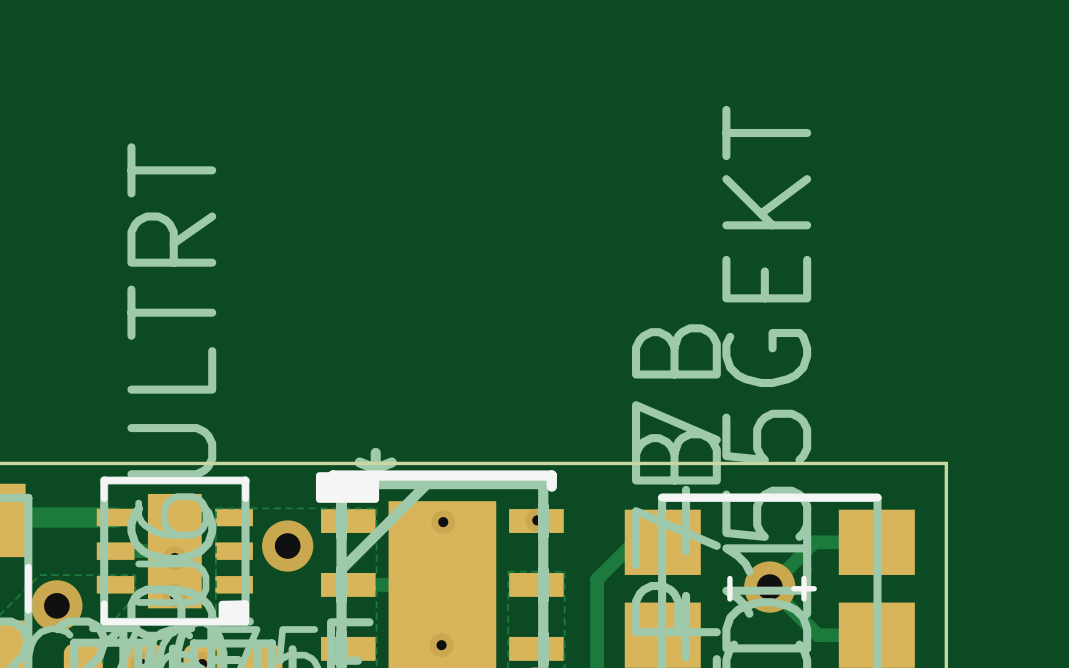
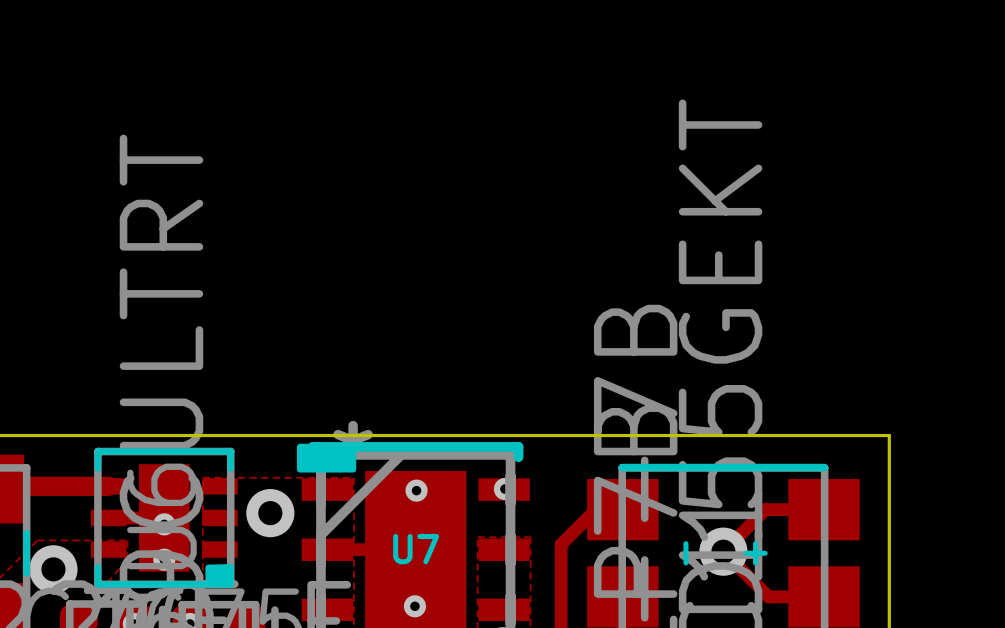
U7 name: none -> U7 (416, 549)

